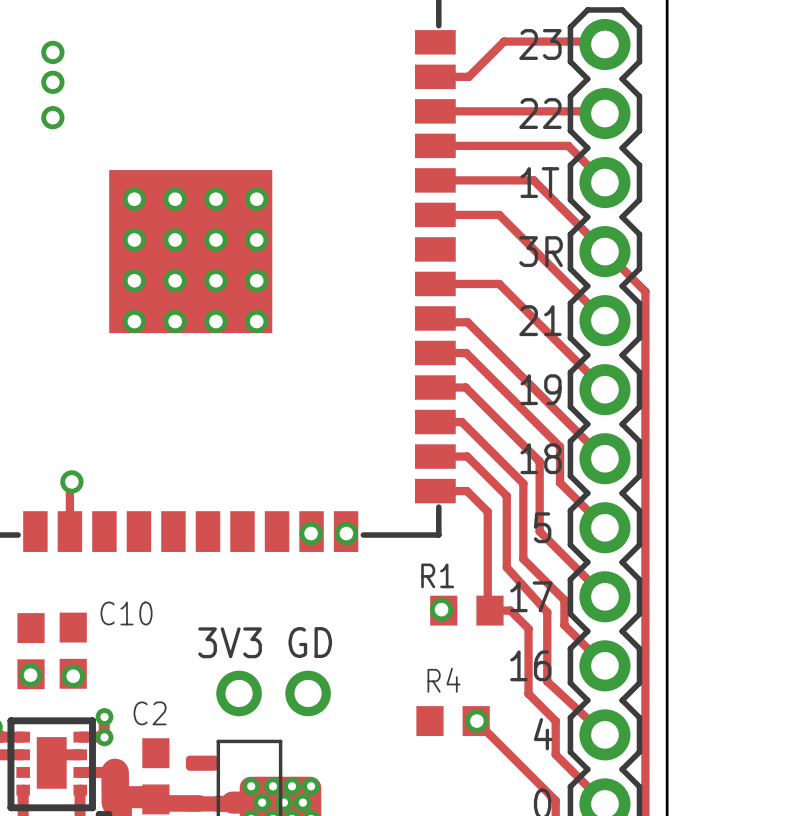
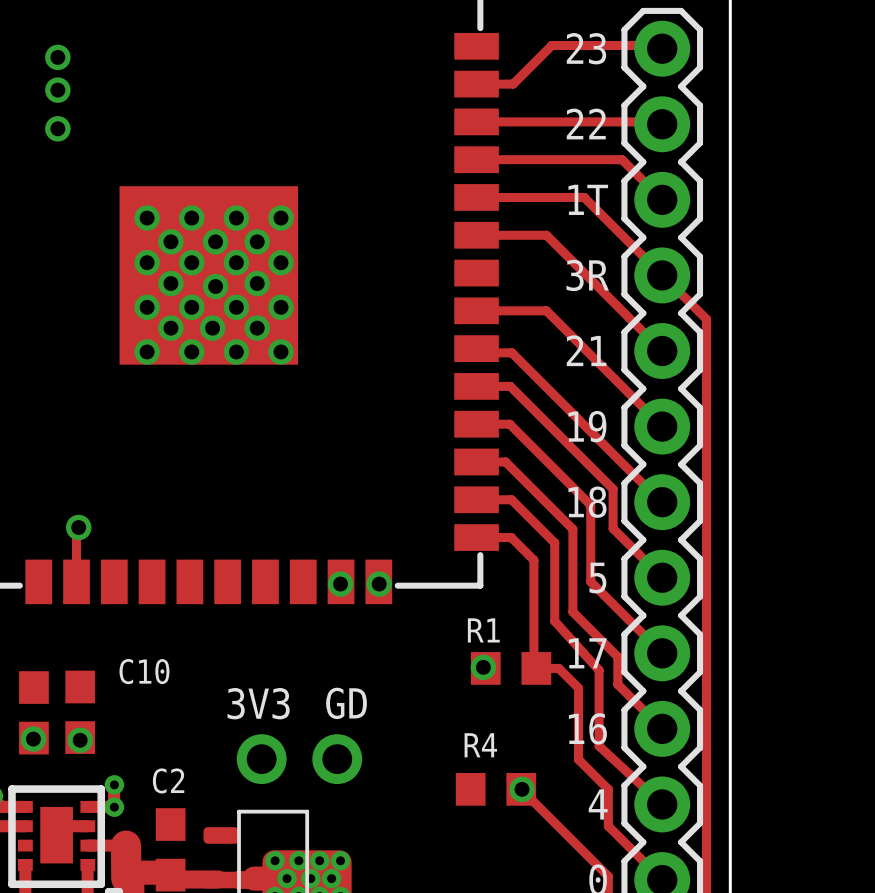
via: none -> (170, 241)
via: none -> (215, 241)
via: none -> (257, 241)
via: none -> (170, 283)
via: none -> (257, 283)
via: none -> (215, 286)
via: none -> (170, 328)
via: none -> (212, 328)
via: none -> (257, 328)

